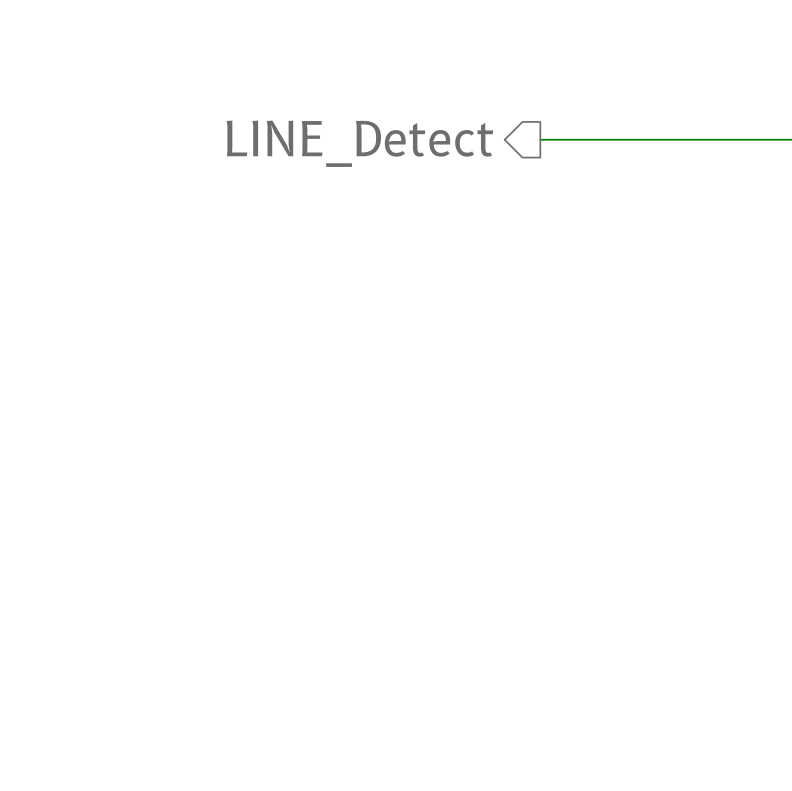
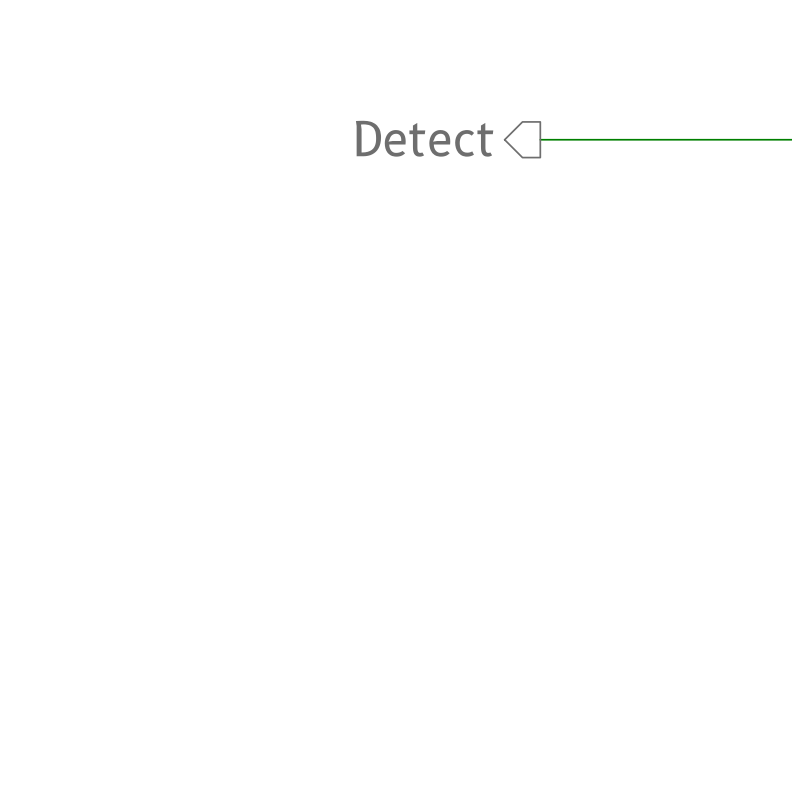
hierarchical label: LINE_Detect (359, 143) -> Detect (424, 138)

